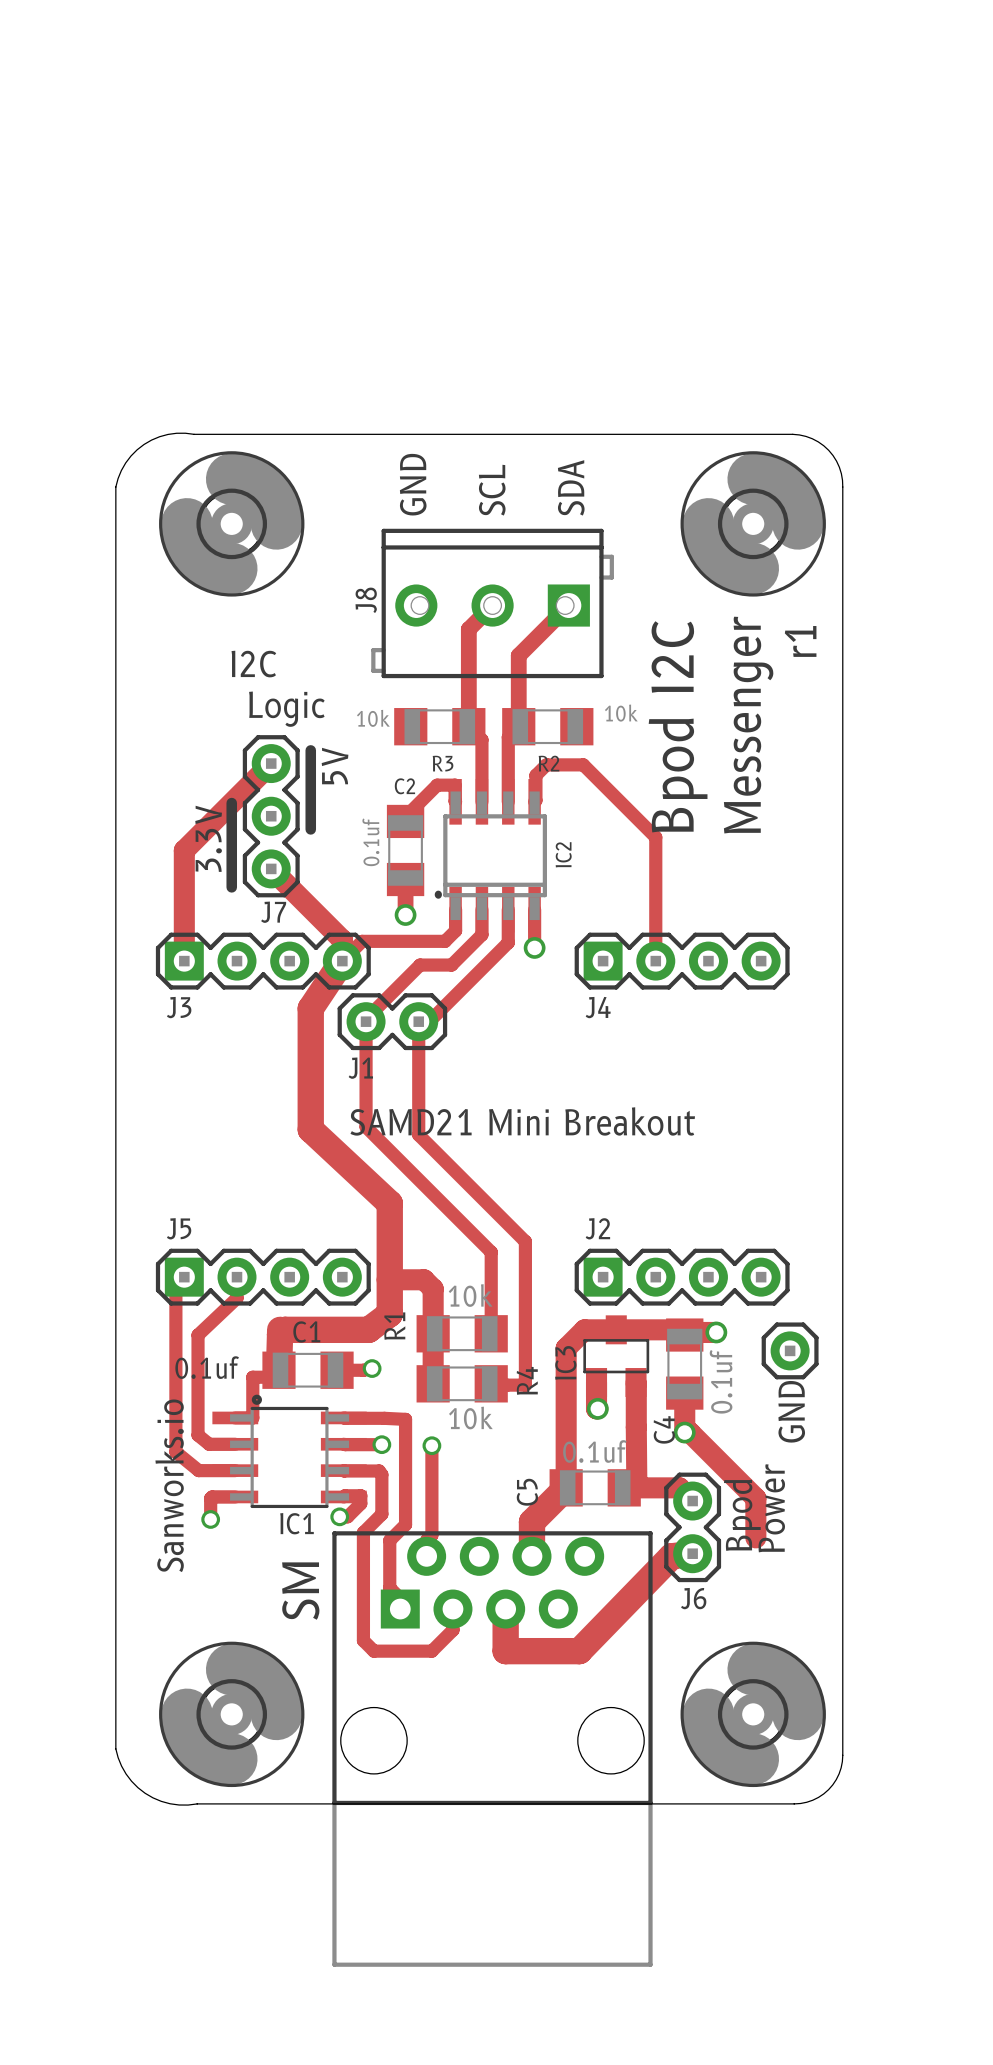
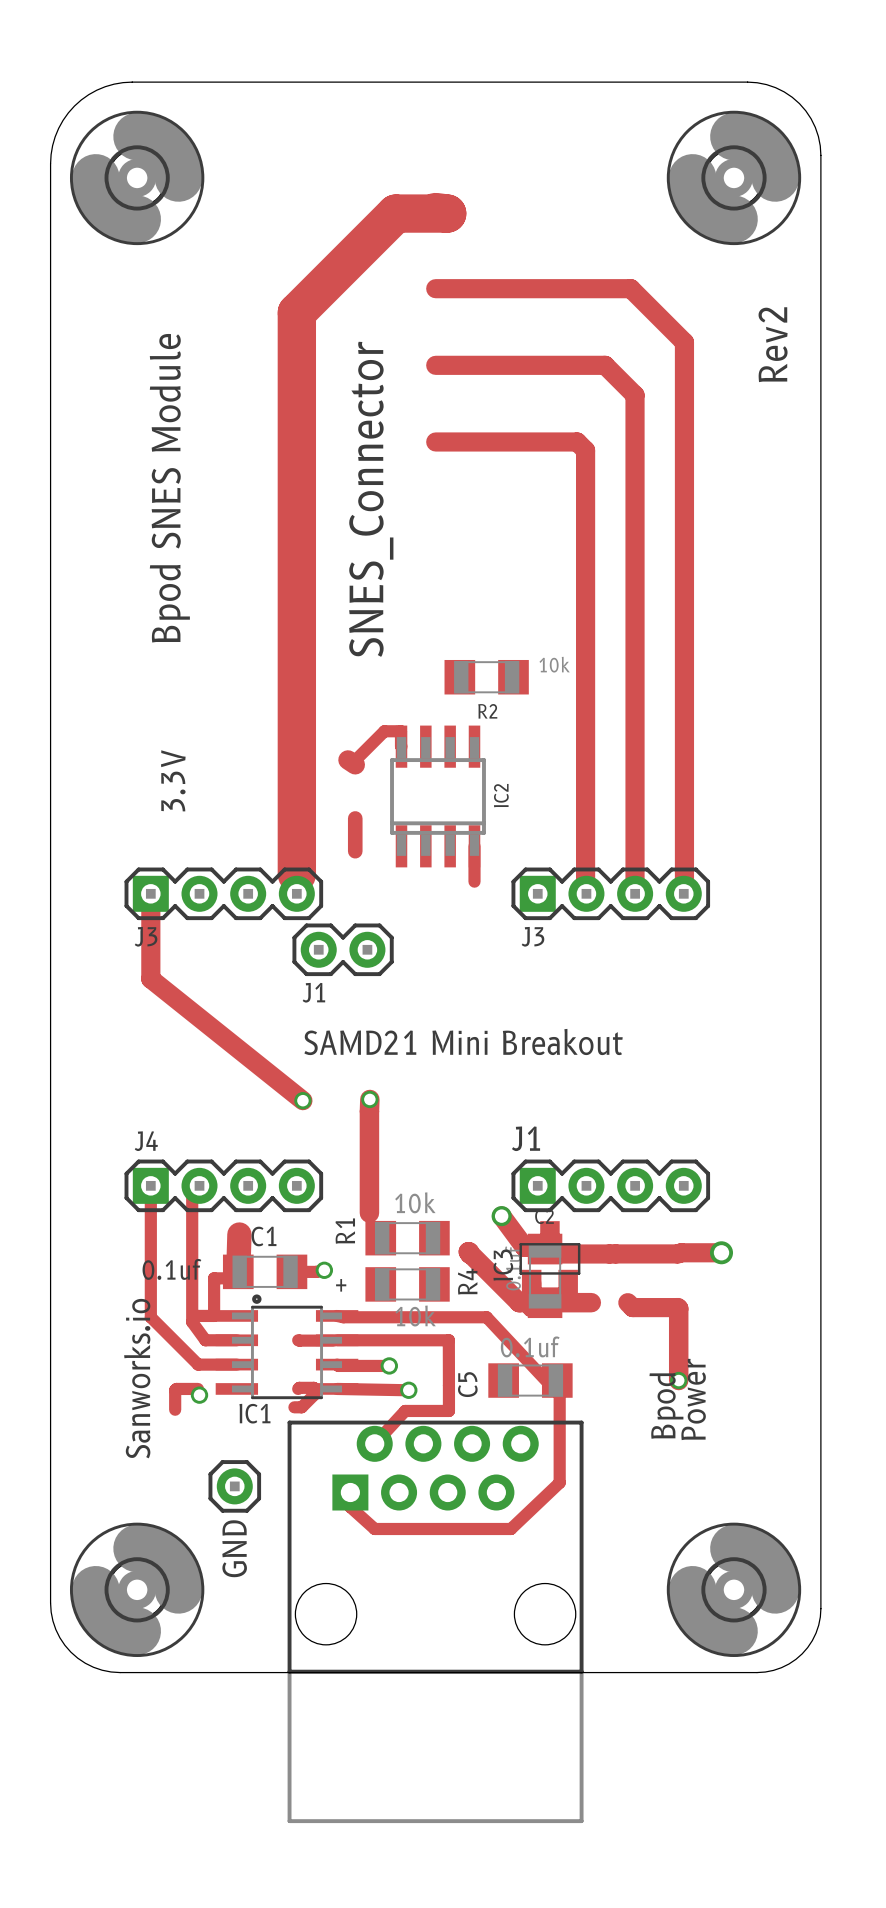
part: none -> (137, 177)
part: none -> (733, 177)
track: none -> (435, 288) (630, 288) (684, 342) (683, 893)
text: none -> Rev2 (773, 344)
track: none -> (435, 365) (605, 365) (635, 395) (635, 893)
text: GND (413, 484) -> none
text: SDA (571, 487) -> none
text: SCL (492, 490) -> none
text: none -> Bpod SNES Module (169, 488)
part: (231, 523) -> none
part: (753, 523) -> none
text: none -> SNES_Connector (371, 499)
J8: (492, 603) -> none
track: (492, 605) (468, 629) (468, 726) (481, 739) (481, 801) -> none
track: (568, 605) (518, 655) (518, 726) (508, 737) (508, 801) -> none
text: r1 (800, 641) -> none
text: I2C (253, 664) -> none
text: Logic (286, 709) -> none
text: Messenger (748, 725) -> none
R3: 10k (439, 726) -> none
text: Bpod I2C (678, 726) -> none
line: (310, 750) (310, 829) -> none
track: (271, 763) (184, 850) (184, 961) -> (302, 1100) (150, 979) (150, 893)
text: 5V (335, 766) -> none
track: (534, 801) (535, 775) (546, 764) (583, 764) (655, 837) (655, 961) -> (435, 441) (577, 441) (585, 450) (586, 893)
line: (231, 803) (231, 887) -> none
J7: (271, 816) -> none
C2 position: (405, 850) -> (545, 1275)
track: (271, 868) (342, 940) -> (435, 212) (447, 213) (395, 213) (296, 312) (296, 874)
text: . (438, 894) -> none
track: (455, 909) (455, 930) (445, 941) (362, 941) (342, 961) (310, 1008) (310, 1129) (389, 1203) (389, 1314) (368, 1329) (285, 1329) (280, 1334) -> none
track: (481, 909) (481, 934) (451, 965) (420, 965) (366, 1019) (366, 1127) (491, 1252) (491, 1333) -> none
track: (508, 909) (508, 942) (418, 1032) (418, 1134) (525, 1241) (525, 1385) (491, 1383) -> none
via: (405, 915) -> none
via: (534, 947) -> none
J4 name: J4 (598, 1007) -> J3 (533, 936)
track: none -> (369, 1099) (369, 1213)
via: none -> (369, 1099)
via: none -> (302, 1100)
J5 name: J5 (179, 1228) -> J4 (146, 1141)
J2 name: J2 (597, 1228) -> J1 (526, 1138)
track: (184, 1277) (175, 1283) (175, 1452) (198, 1470) (235, 1470) -> (150, 1185) (150, 1317) (198, 1364) (236, 1364)
track: (237, 1277) (237, 1298) (198, 1335) (198, 1435) (209, 1444) (235, 1444) -> (199, 1185) (192, 1193) (192, 1322) (205, 1340) (236, 1340)
track: (389, 1279) (424, 1279) (433, 1288) (433, 1383) -> none
track: none -> (501, 1216) (524, 1247) (537, 1247) (542, 1252) (545, 1249) (550, 1253) (721, 1252)
via: none -> (501, 1216)
track: (716, 1332) (684, 1332) (684, 1335) (679, 1329) (584, 1329) (566, 1348) (566, 1487) (531, 1522) (531, 1556) -> none
via: (716, 1332) -> none
track: none -> (469, 1251) (519, 1302) (591, 1302)
via: none -> (721, 1252)
part: (790, 1350) -> none
C4: 0.1uf (684, 1364) -> none
track: (636, 1382) (636, 1487) (624, 1487) (679, 1487) (692, 1501) -> none
text: none -> + (341, 1285)
track: (684, 1393) (684, 1432) (690, 1432) (755, 1498) (755, 1537) -> none
track: none -> (627, 1302) (632, 1307) (678, 1308) (678, 1380)
via: (597, 1408) -> none
text: GND (791, 1411) -> none
track: (343, 1417) (405, 1419) (405, 1524) (389, 1540) (389, 1587) (400, 1598) (400, 1609) -> (337, 1315) (486, 1317) (559, 1395) (559, 1482) (511, 1528) (374, 1528) (350, 1507) (350, 1492)
via: (684, 1432) -> none
via: (381, 1444) -> none
track: (431, 1445) (431, 1535) (426, 1540) (426, 1556) -> (337, 1340) (448, 1340) (448, 1410) (405, 1410) (374, 1443)
via position: (431, 1445) -> (389, 1365)
IC1 position: (289, 1451) -> (287, 1346)
track: (343, 1470) (379, 1471) (381, 1474) (381, 1514) (363, 1532) (363, 1640) (373, 1651) (431, 1651) (452, 1630) (452, 1609) -> none
track: none -> (337, 1364) (389, 1365)
via: none -> (678, 1380)
track: none -> (337, 1388) (408, 1390)
via: none -> (408, 1390)
via: (339, 1516) -> none
via position: (210, 1519) -> (199, 1395)
J6: (692, 1527) -> none
track: (692, 1553) (671, 1556) (579, 1651) (505, 1651) (505, 1609) -> none
text: SM (300, 1591) -> none
part: none -> (234, 1486)
text: none -> GND (234, 1548)
part position: (231, 1714) -> (137, 1589)
part position: (753, 1714) -> (733, 1589)
board edge: (197, 1803) (170, 1803) (145, 1793) (126, 1774) (115, 1748) (115, 487) (121, 470) (137, 449) (159, 436) (176, 433) (792, 434) (812, 438) (823, 445) (832, 455) (839, 467) (842, 487) (842, 1755) (839, 1773) (828, 1789) (812, 1800) (794, 1803) -> (162, 1672) (111, 1671) (85, 1663) (70, 1652) (59, 1637) (51, 1612) (50, 163) (55, 136) (63, 120) (81, 99) (96, 90) (123, 82) (747, 82) (775, 87) (799, 103) (815, 127) (820, 155) (820, 1608) (818, 1625) (812, 1640) (802, 1653) (788, 1664) (765, 1672) (714, 1672)

